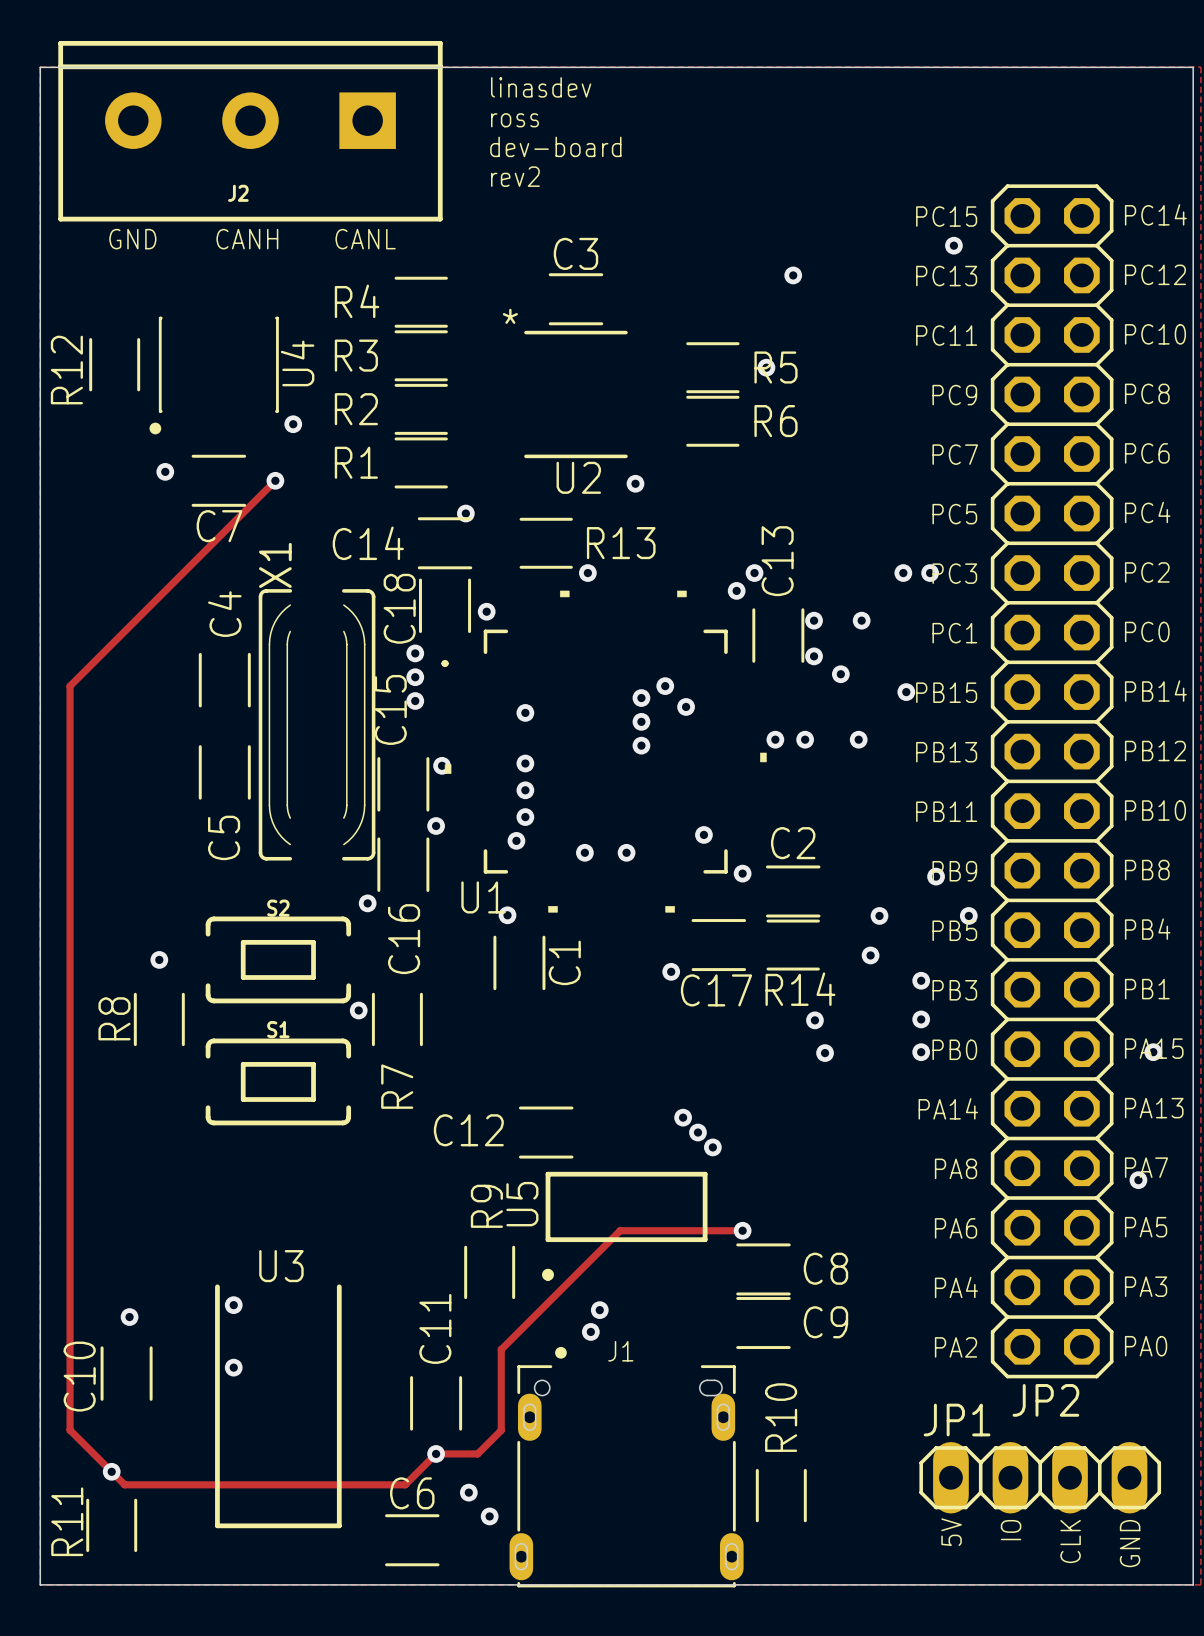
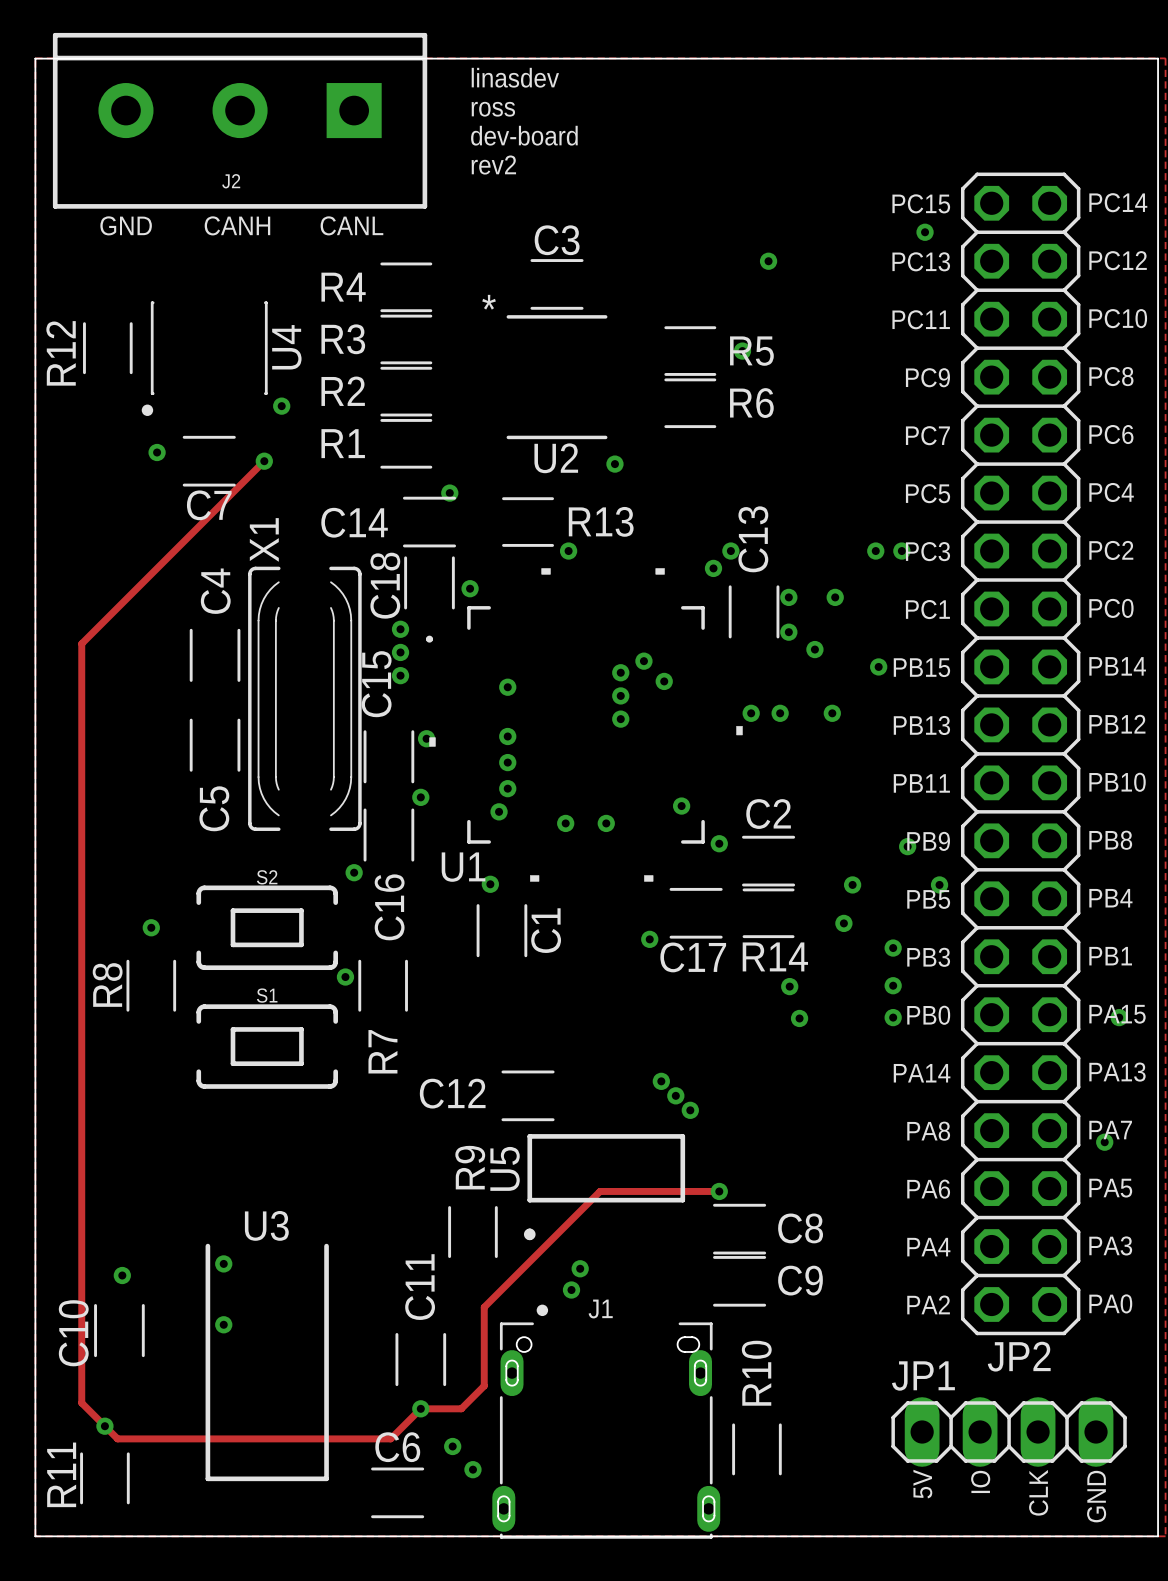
track: (87, 668) (70, 686) (70, 1430) (87, 1447) -> (81, 643) (81, 1403)

